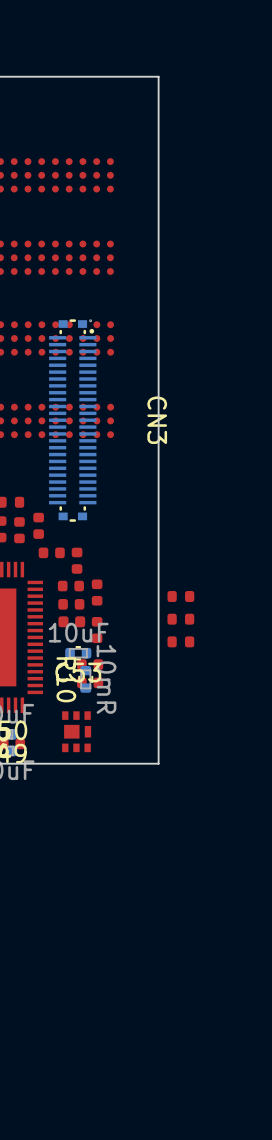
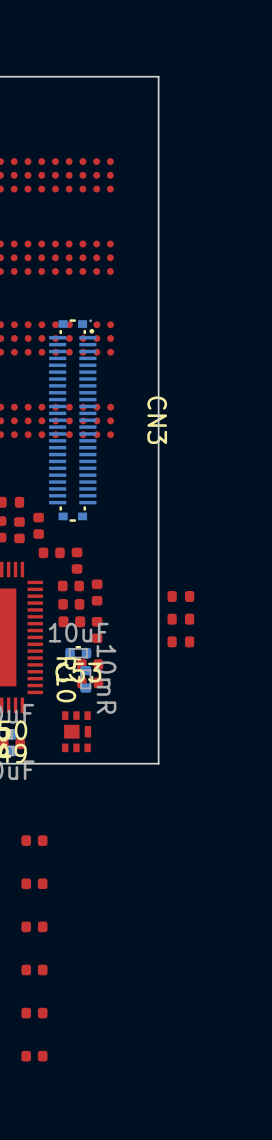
part: none -> (34, 840)
part: none -> (34, 883)
part: none -> (34, 926)
part: none -> (34, 969)
part: none -> (34, 1013)
part: none -> (34, 1056)

